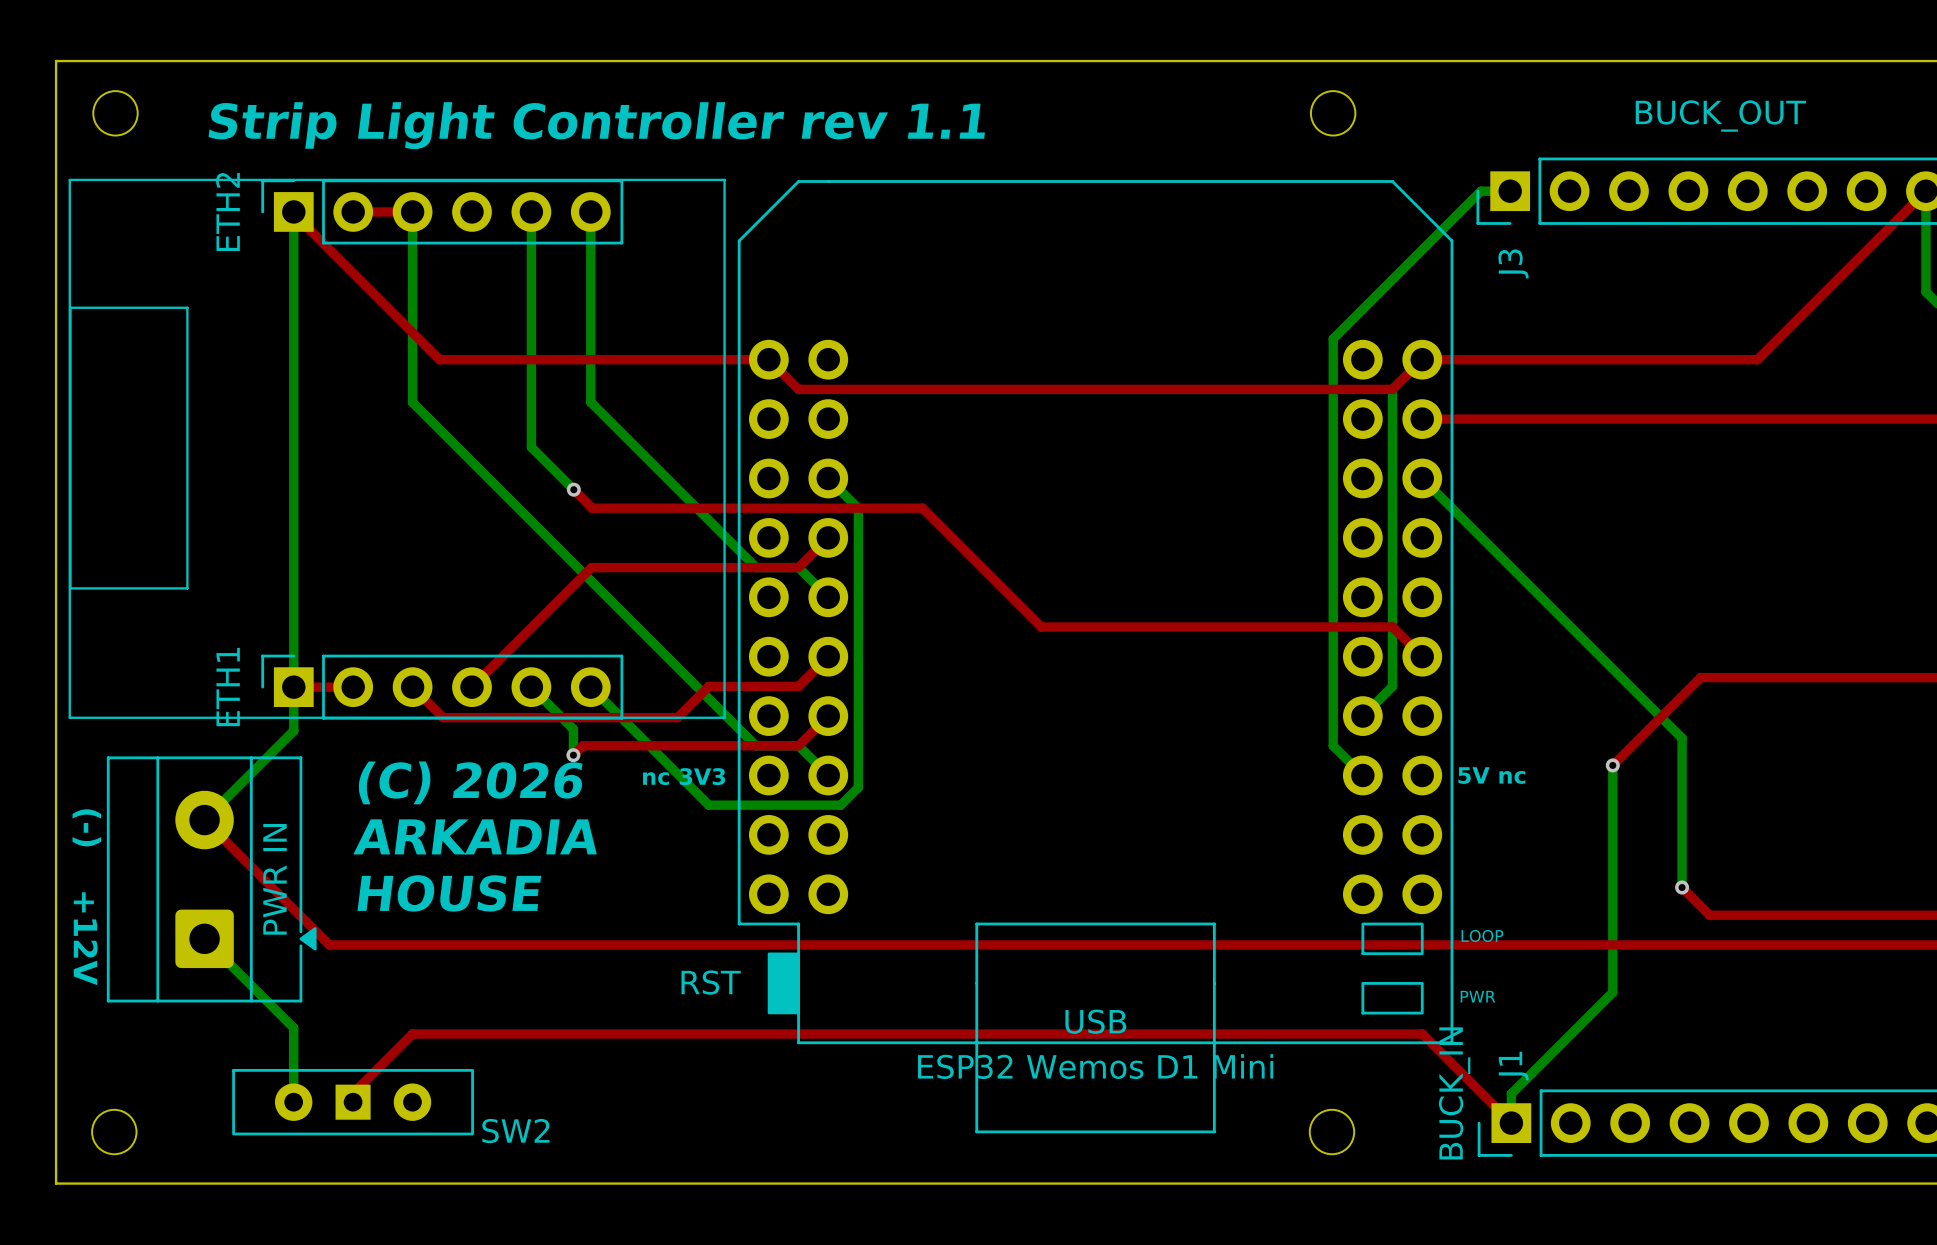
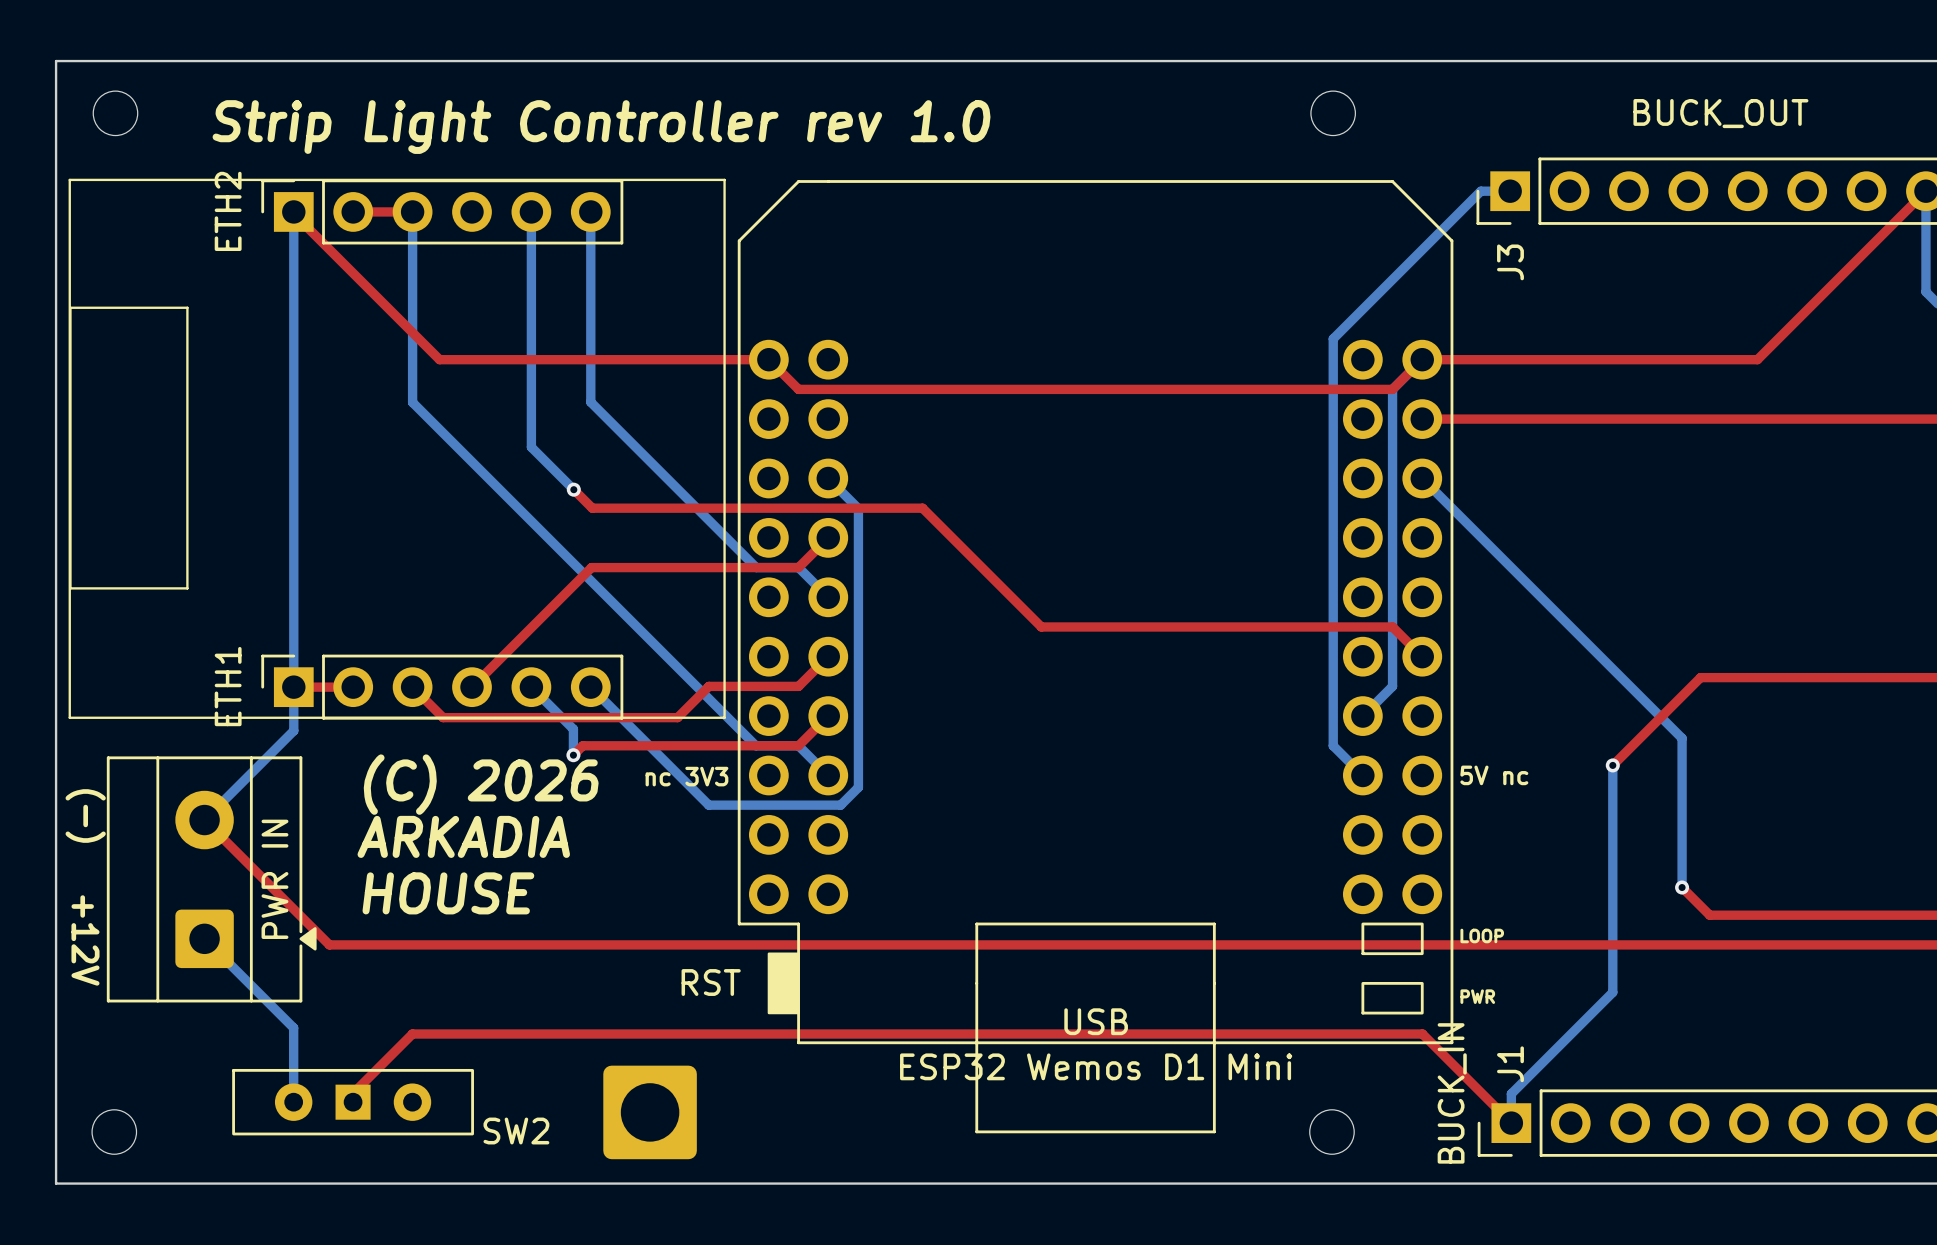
text: Strip Light Controller rev 1.1 (596, 125) -> Strip Light Controller rev 1.0 (601, 127)
part: none -> (650, 1112)

